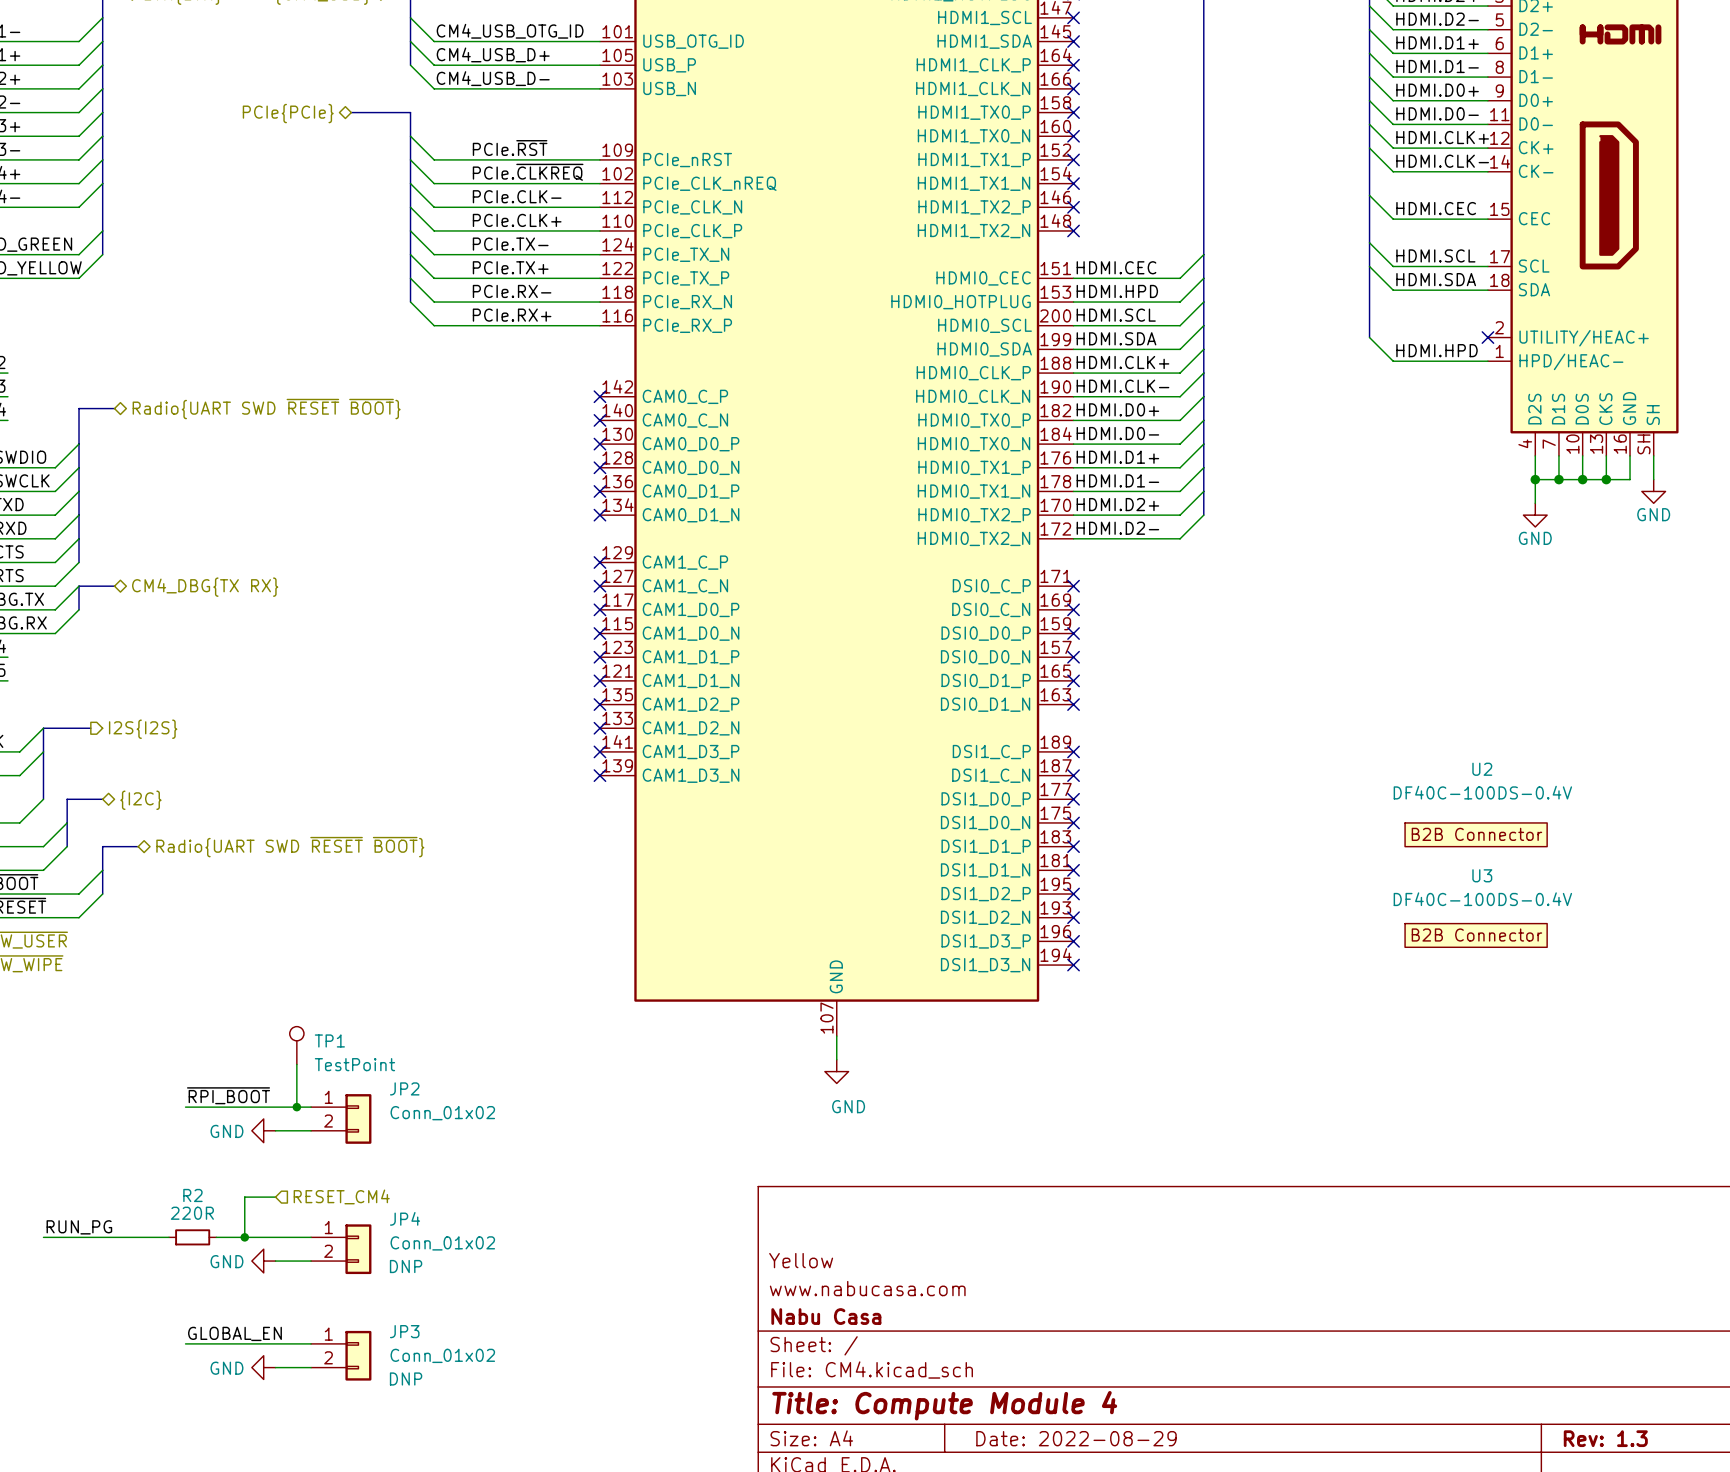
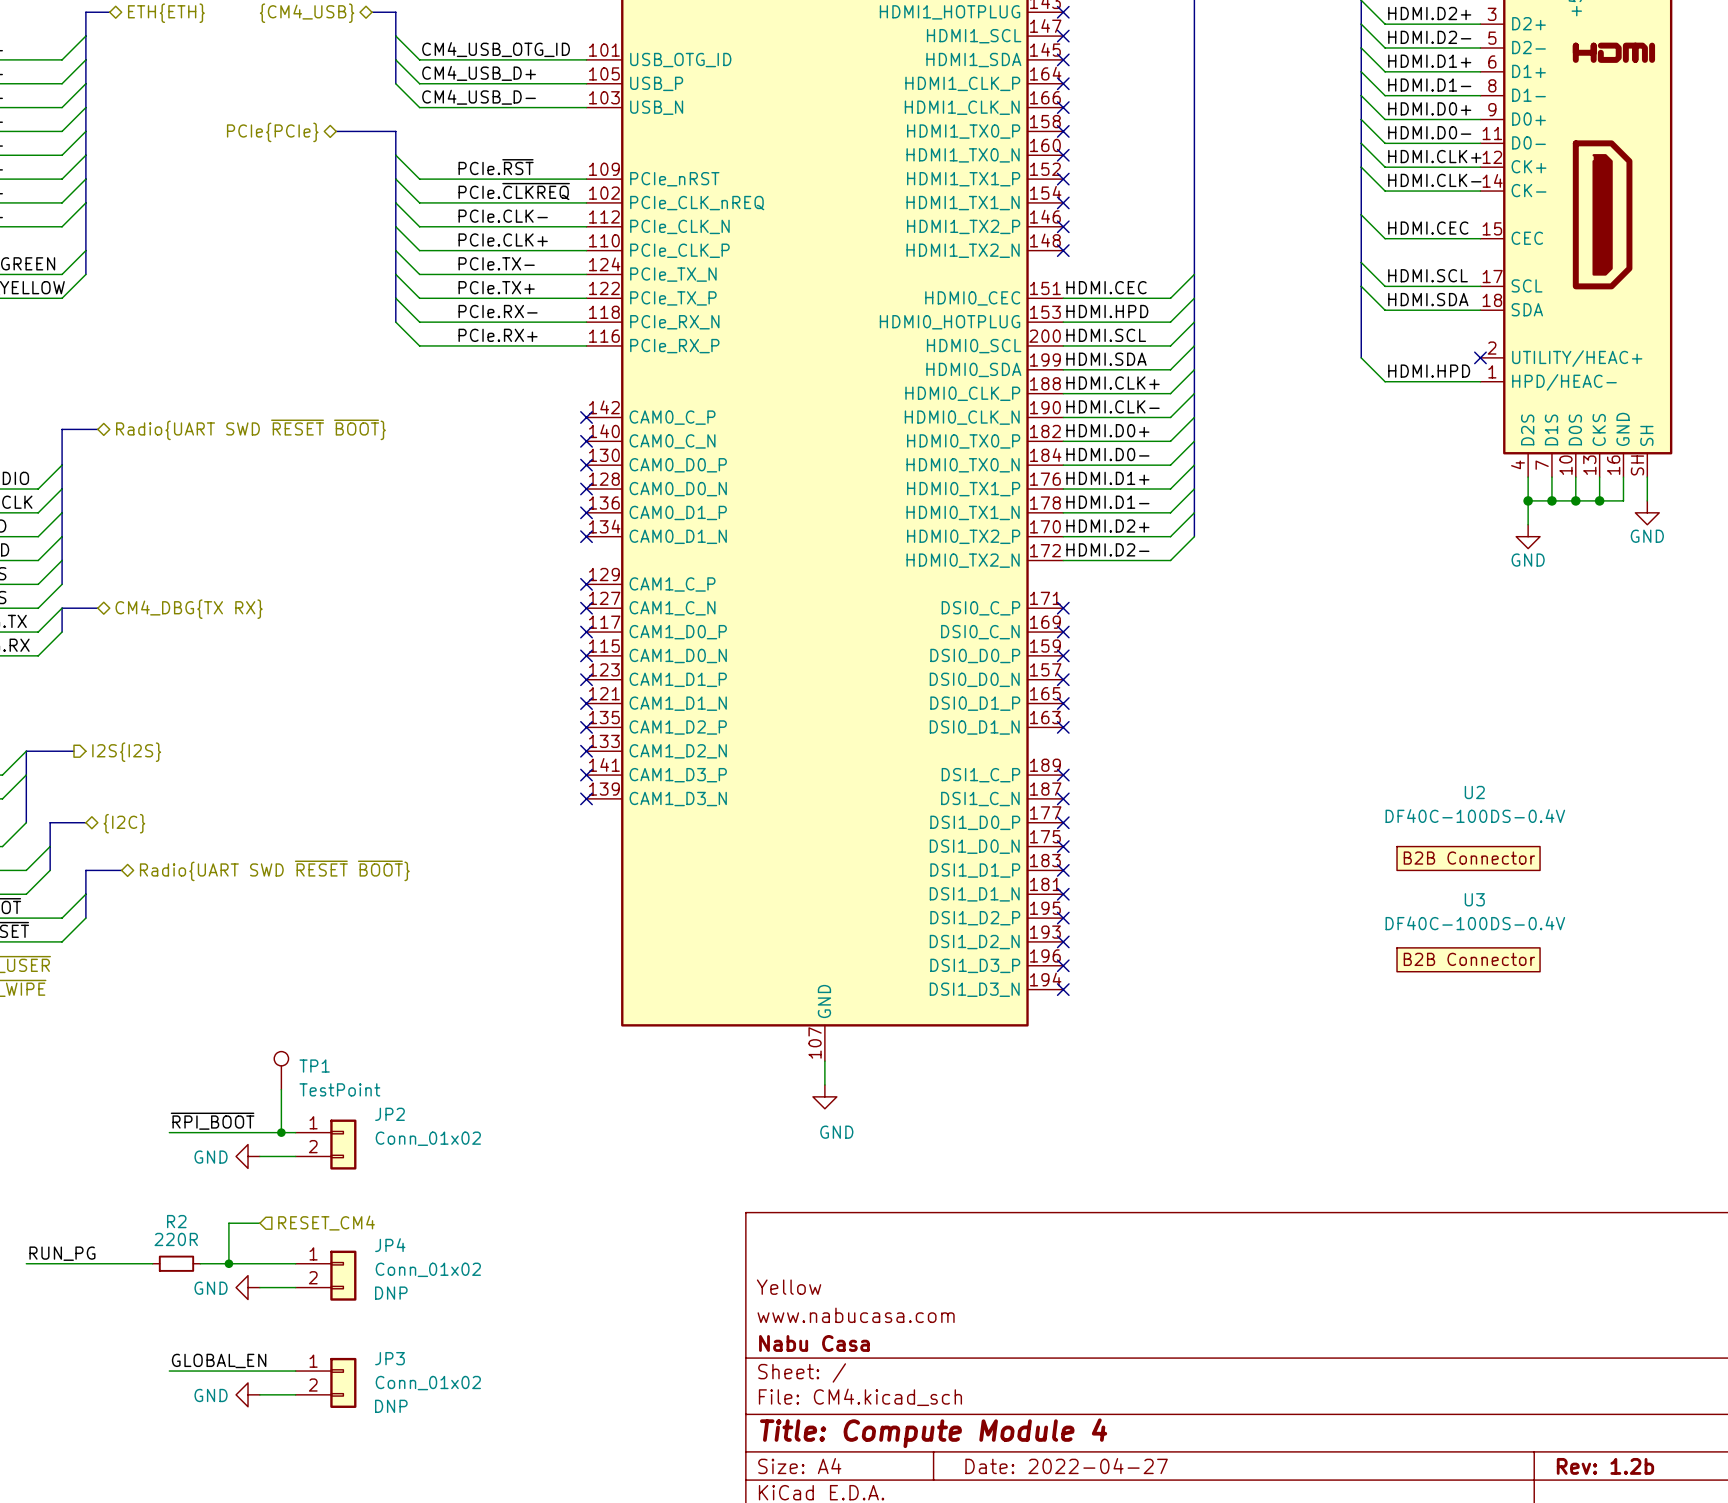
title block: Date: 2022-08-29 (1076, 1438) -> Date: 2022-04-27 (1066, 1466)
title block: Rev: 1.3 (1605, 1438) -> Rev: 1.2b (1605, 1466)

